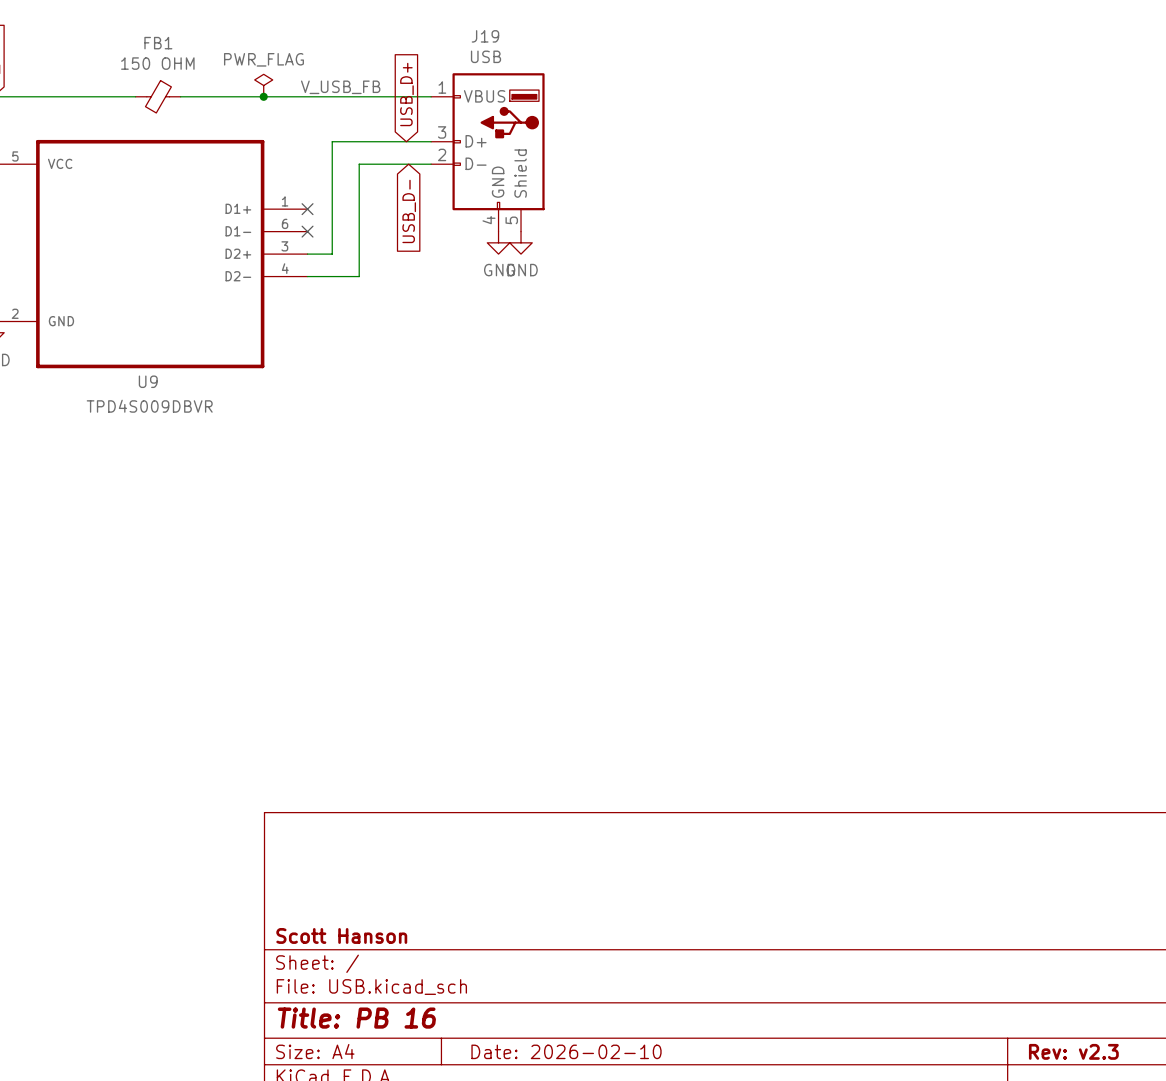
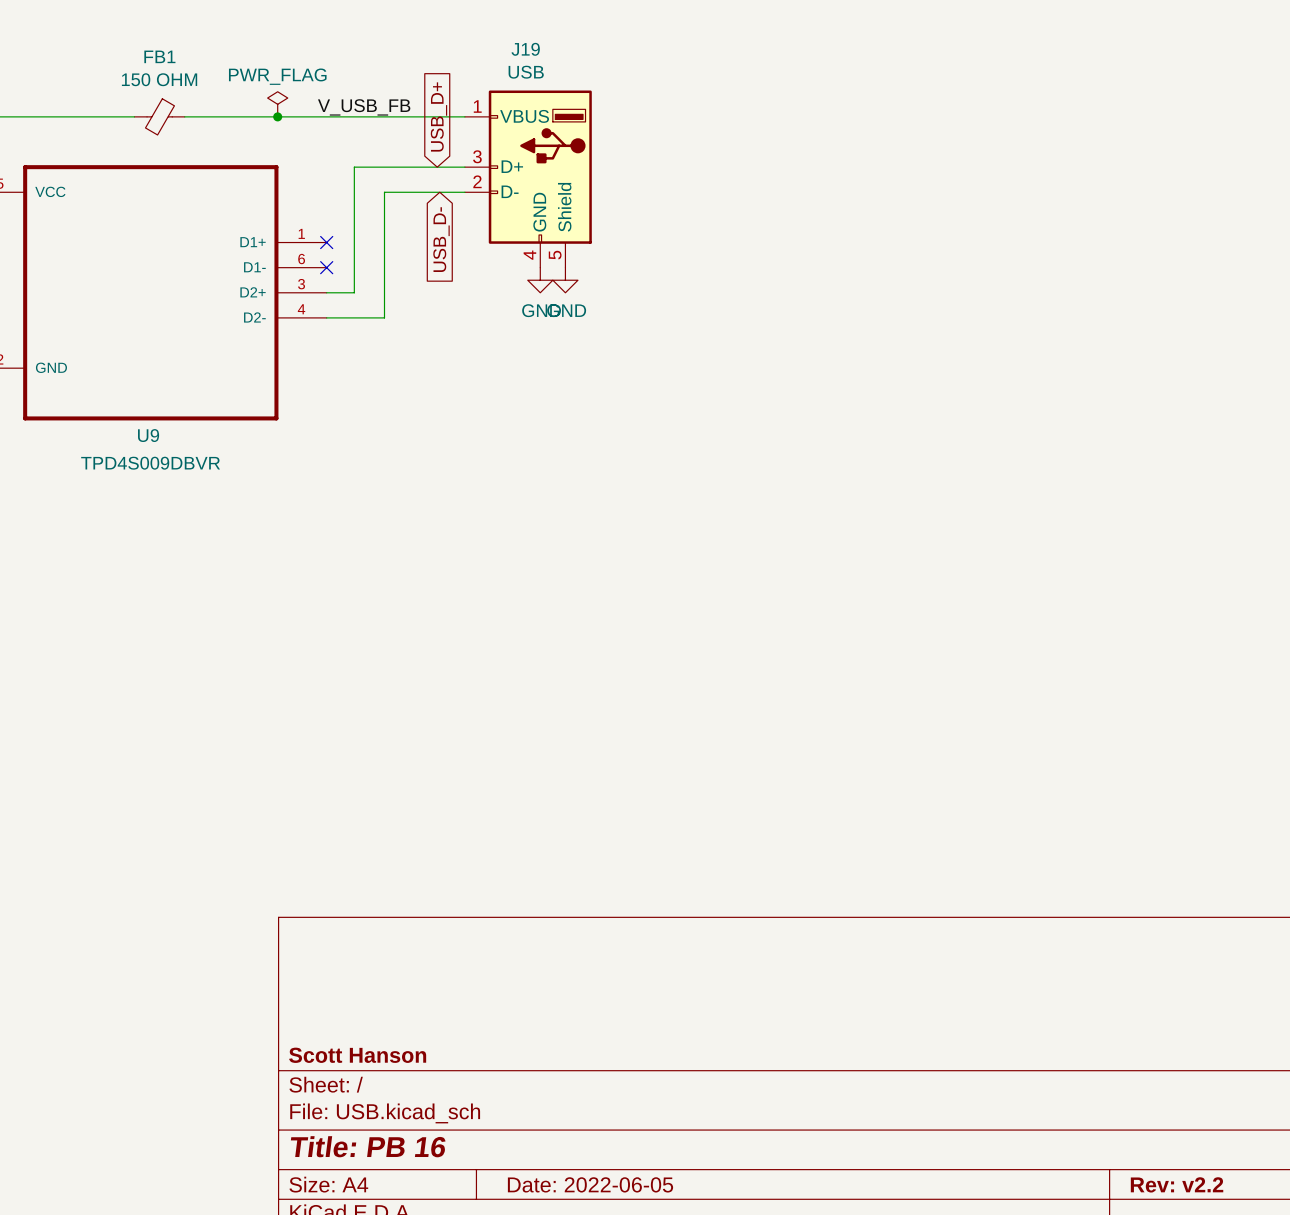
title block: Date: 2026-02-10 (566, 1051) -> Date: 2022-06-05 (590, 1184)
title block: Rev: v2.3 (1073, 1051) -> Rev: v2.2 (1177, 1184)

